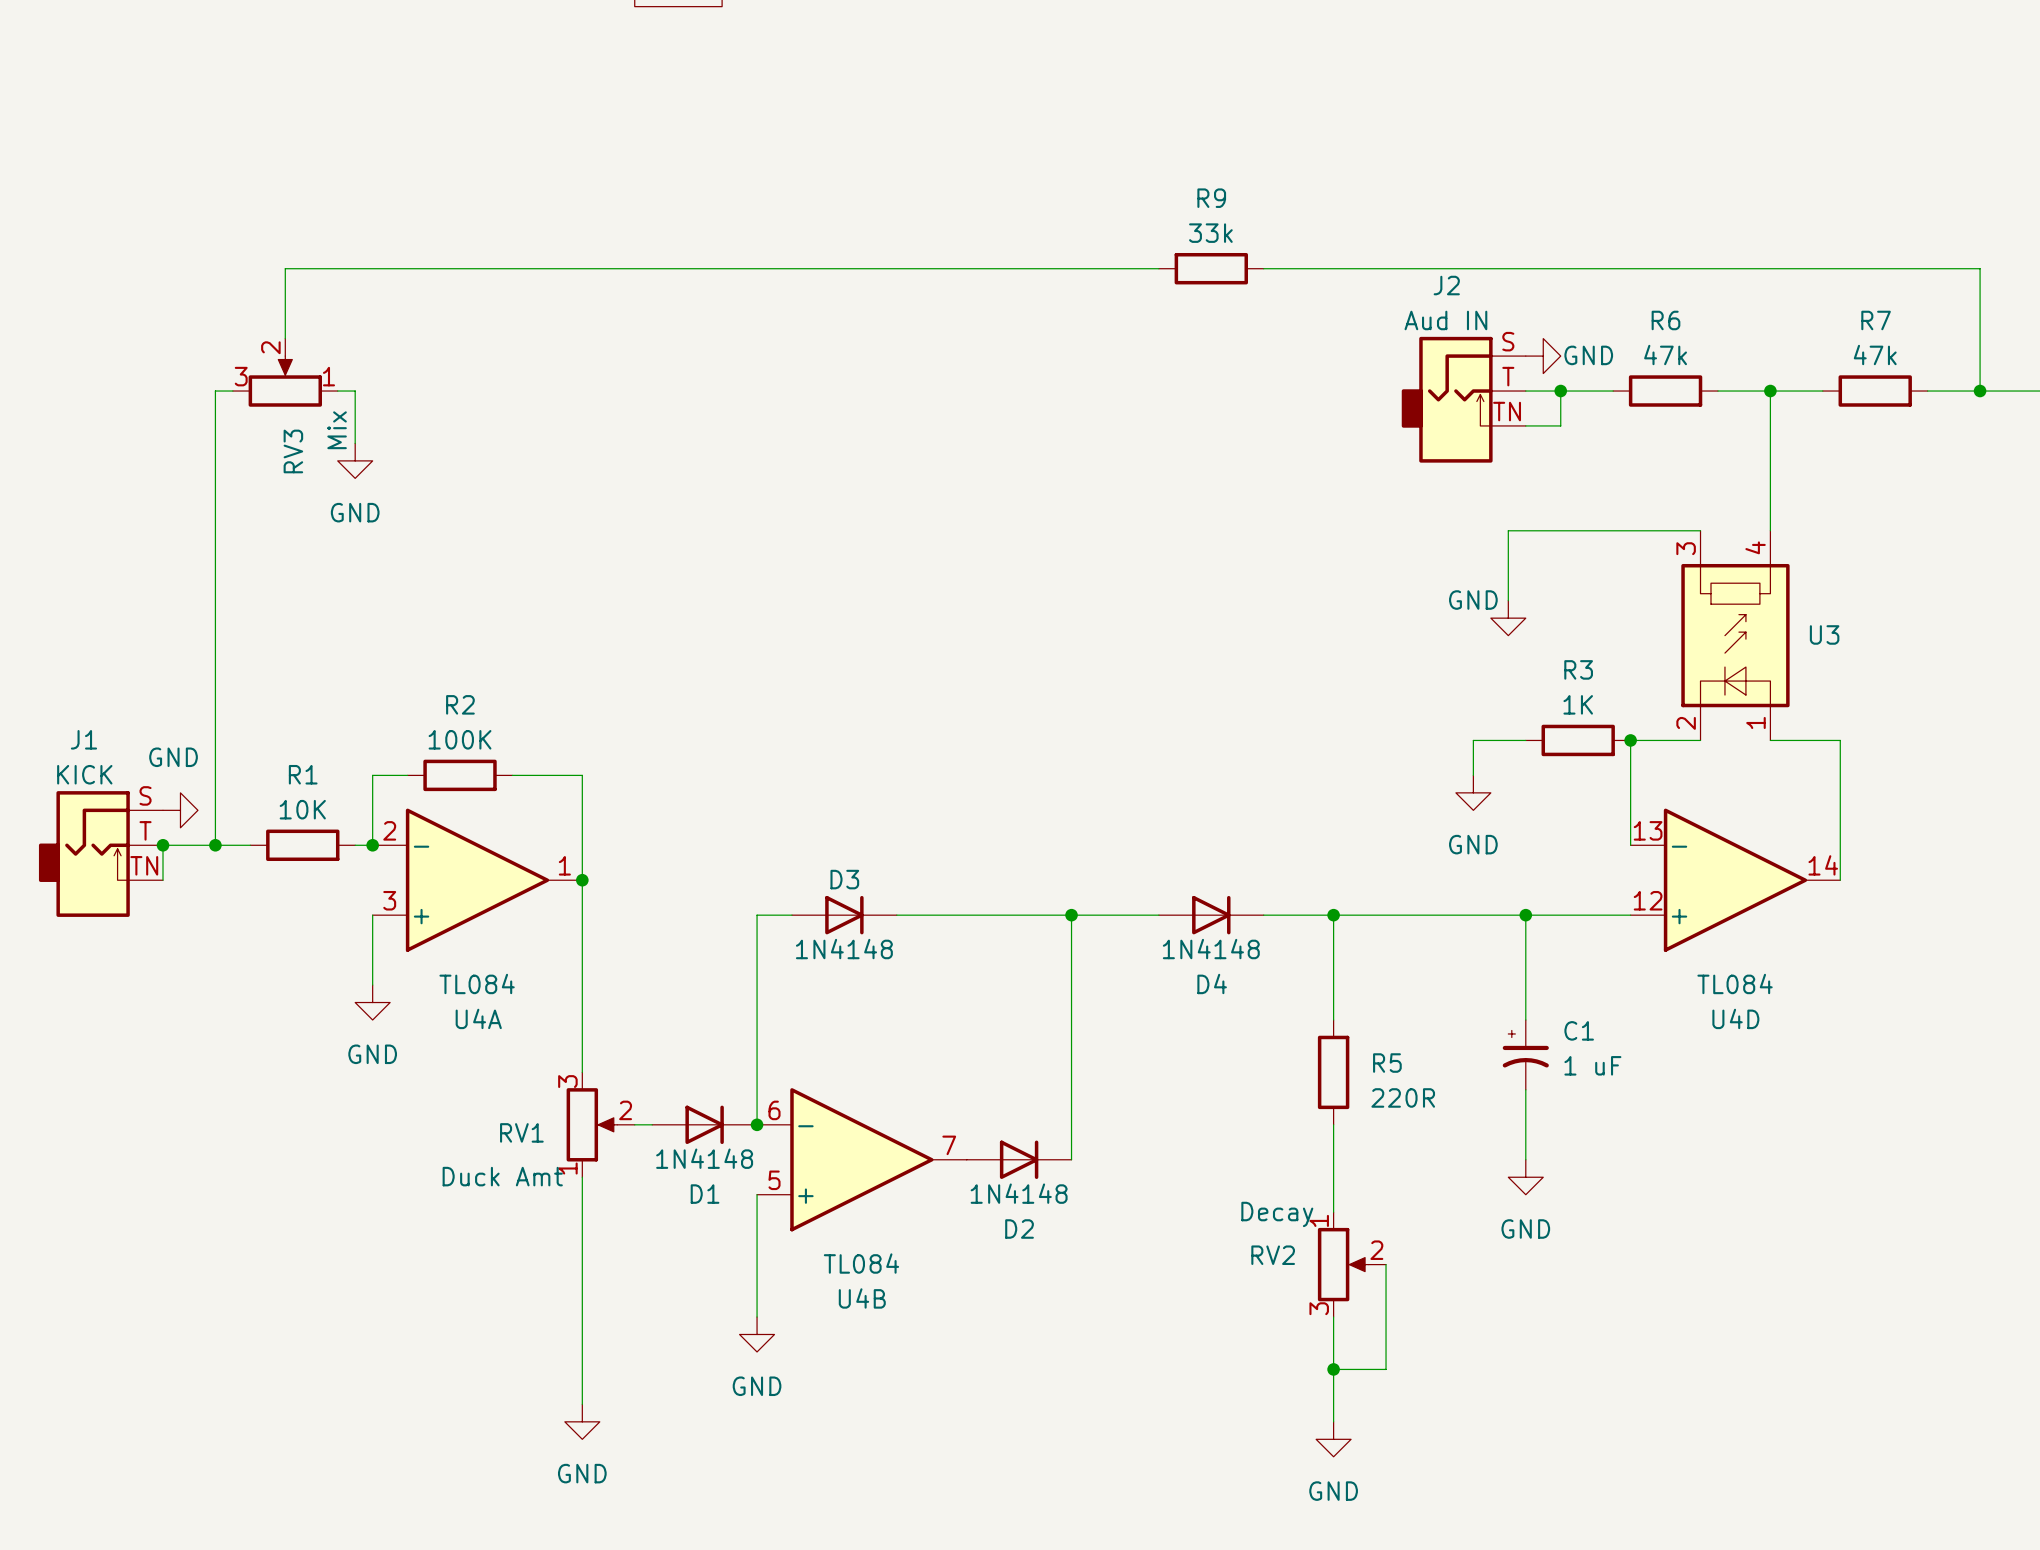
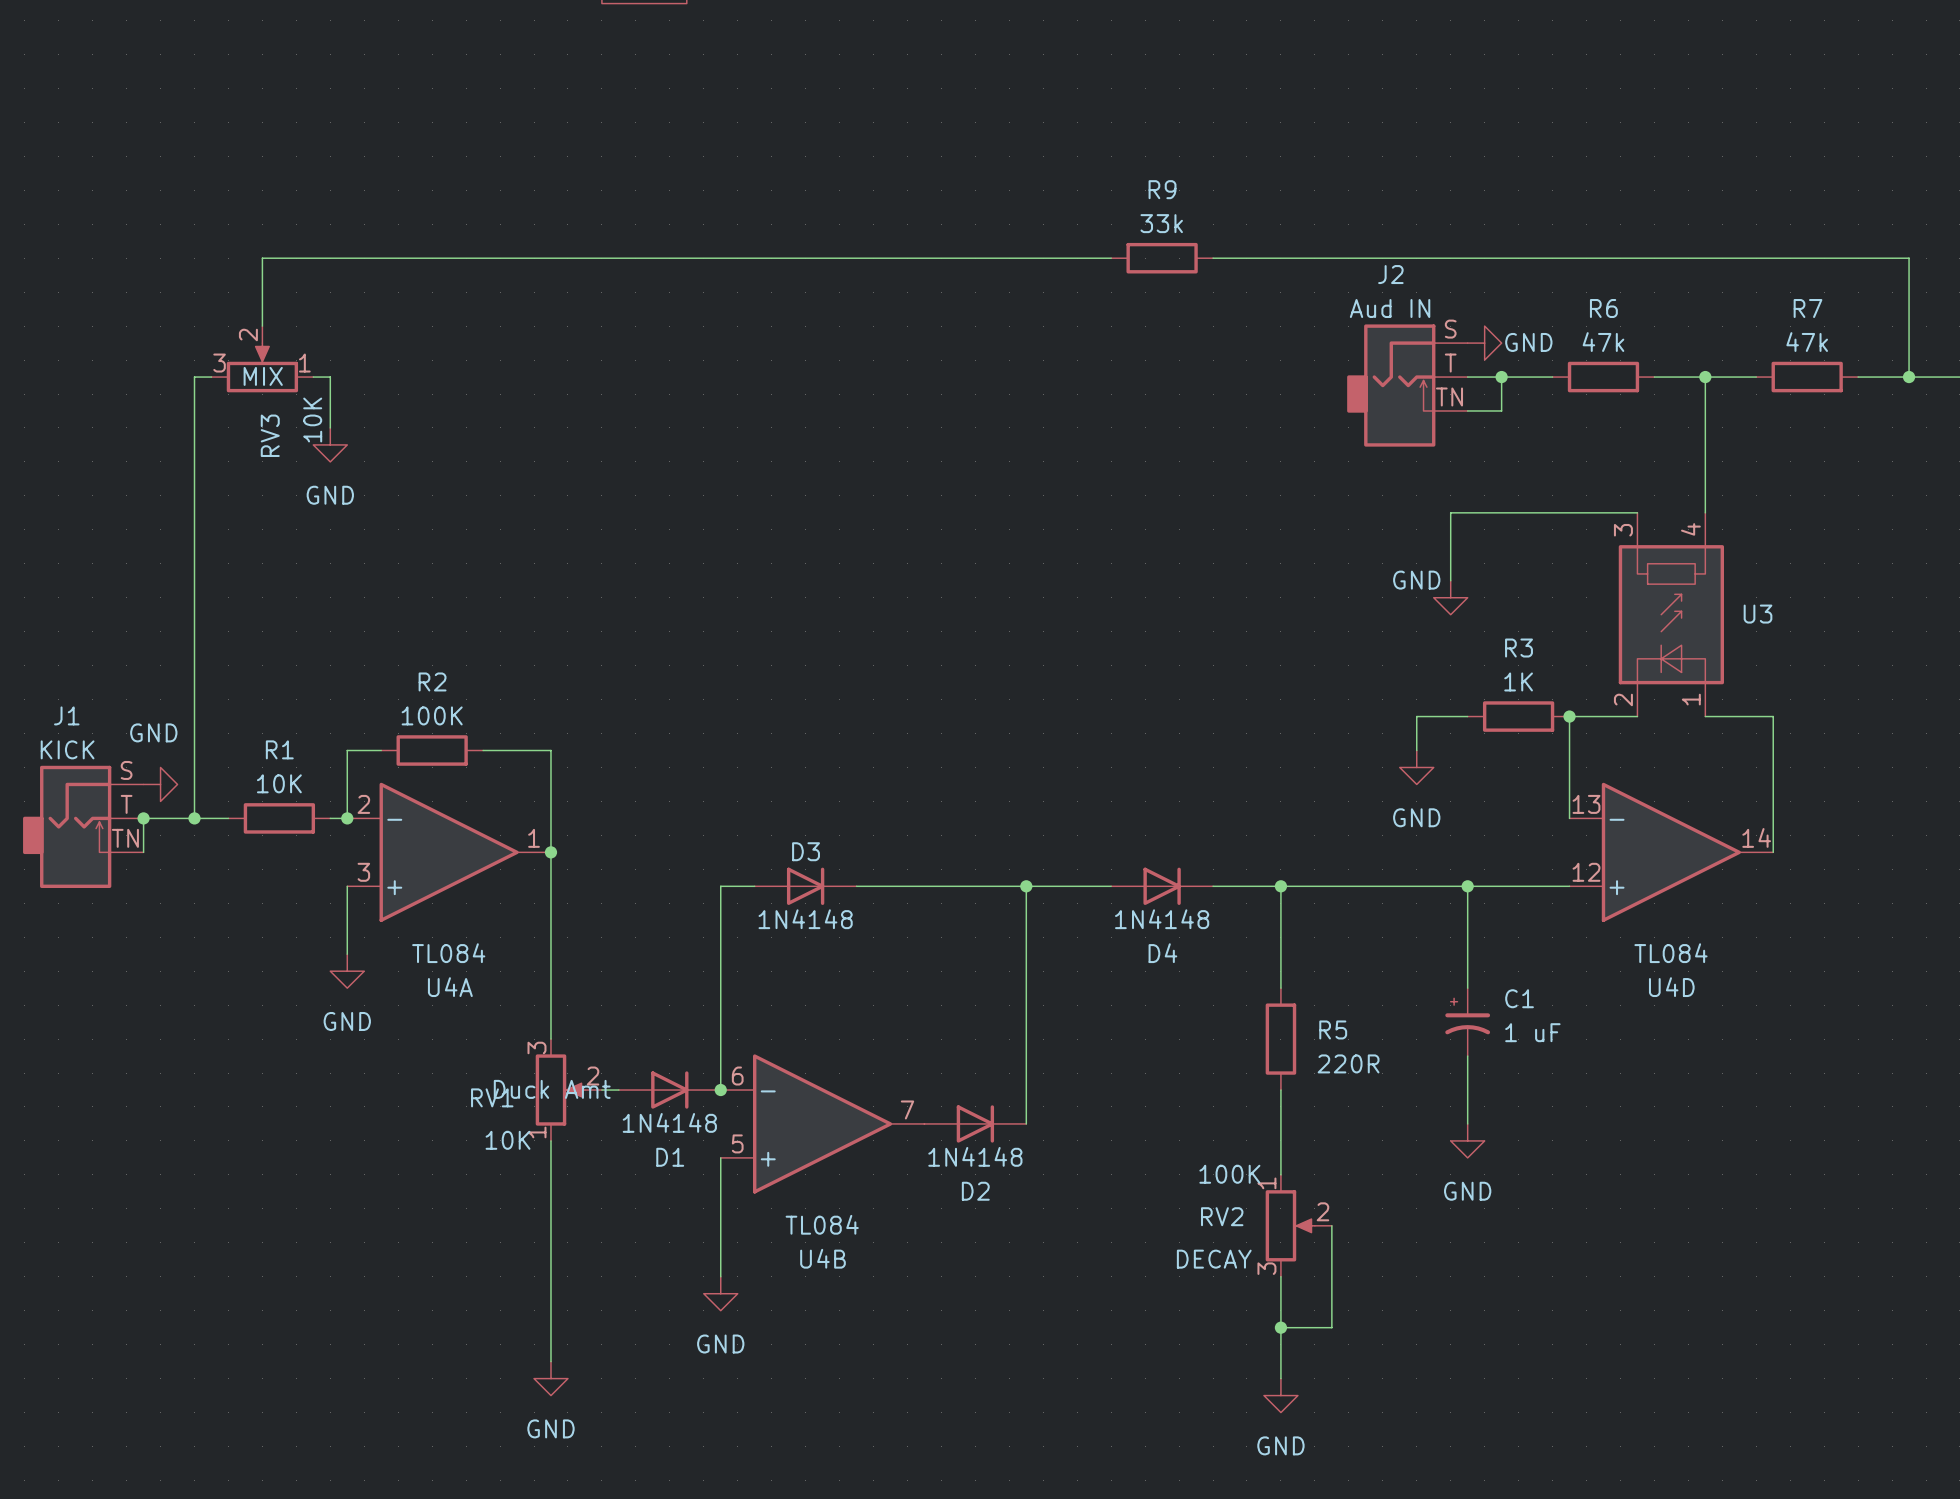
RV3 text: none -> MIX (263, 376)
RV3 value: Mix (337, 430) -> 10K (312, 420)
RV1 text: none -> Duck Amt (552, 1089)
RV1 value: Duck Amt (502, 1176) -> 10K (508, 1140)
RV2 value: Decay (1277, 1214) -> 100K (1229, 1174)
RV2 text: none -> DECAY (1214, 1259)

